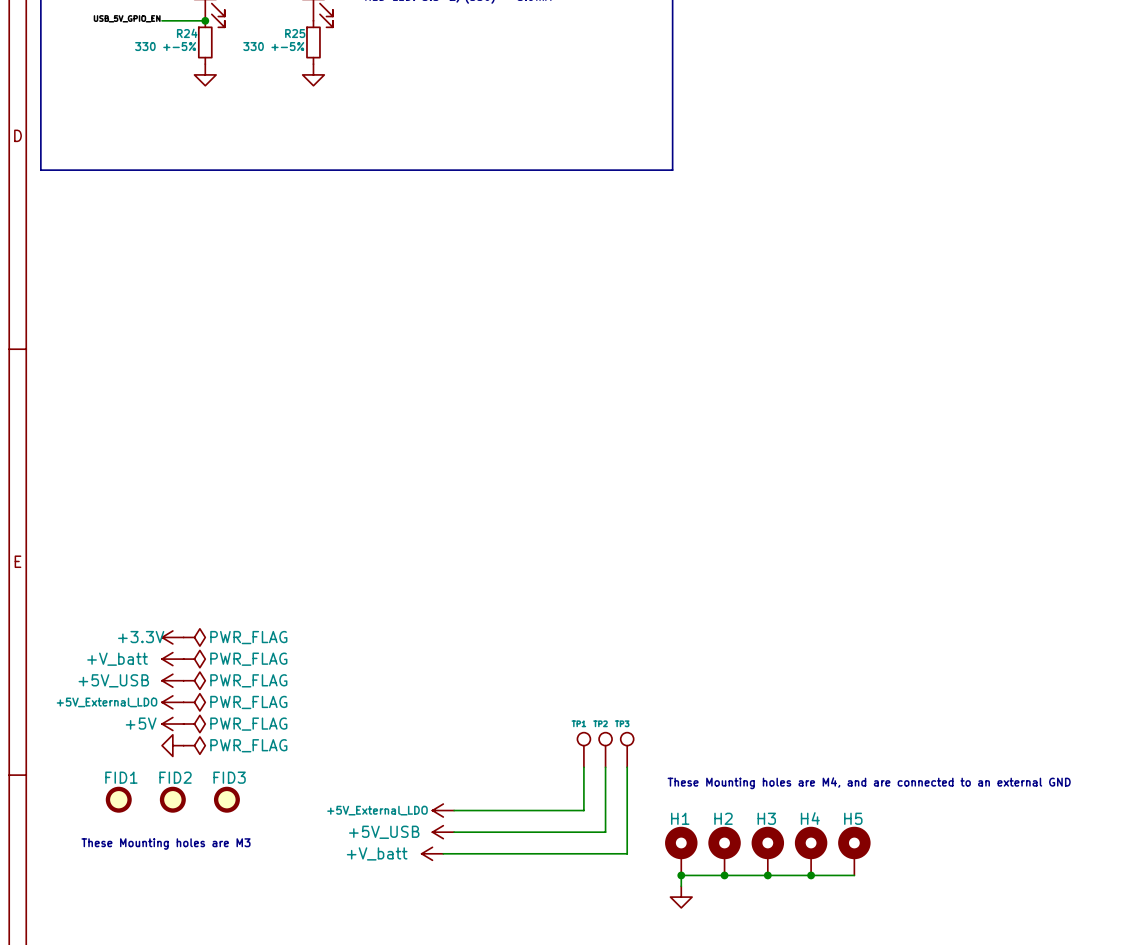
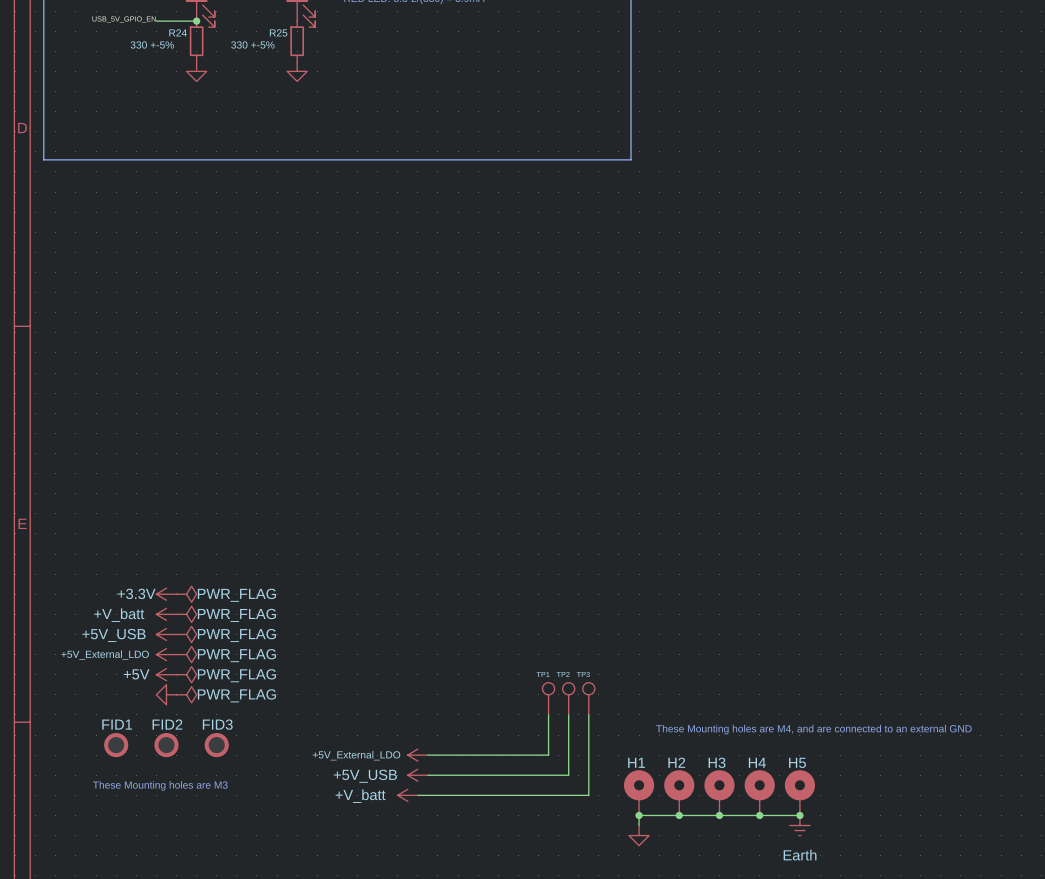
junction: none -> (799, 815)
power symbol: none -> Earth (799, 825)

